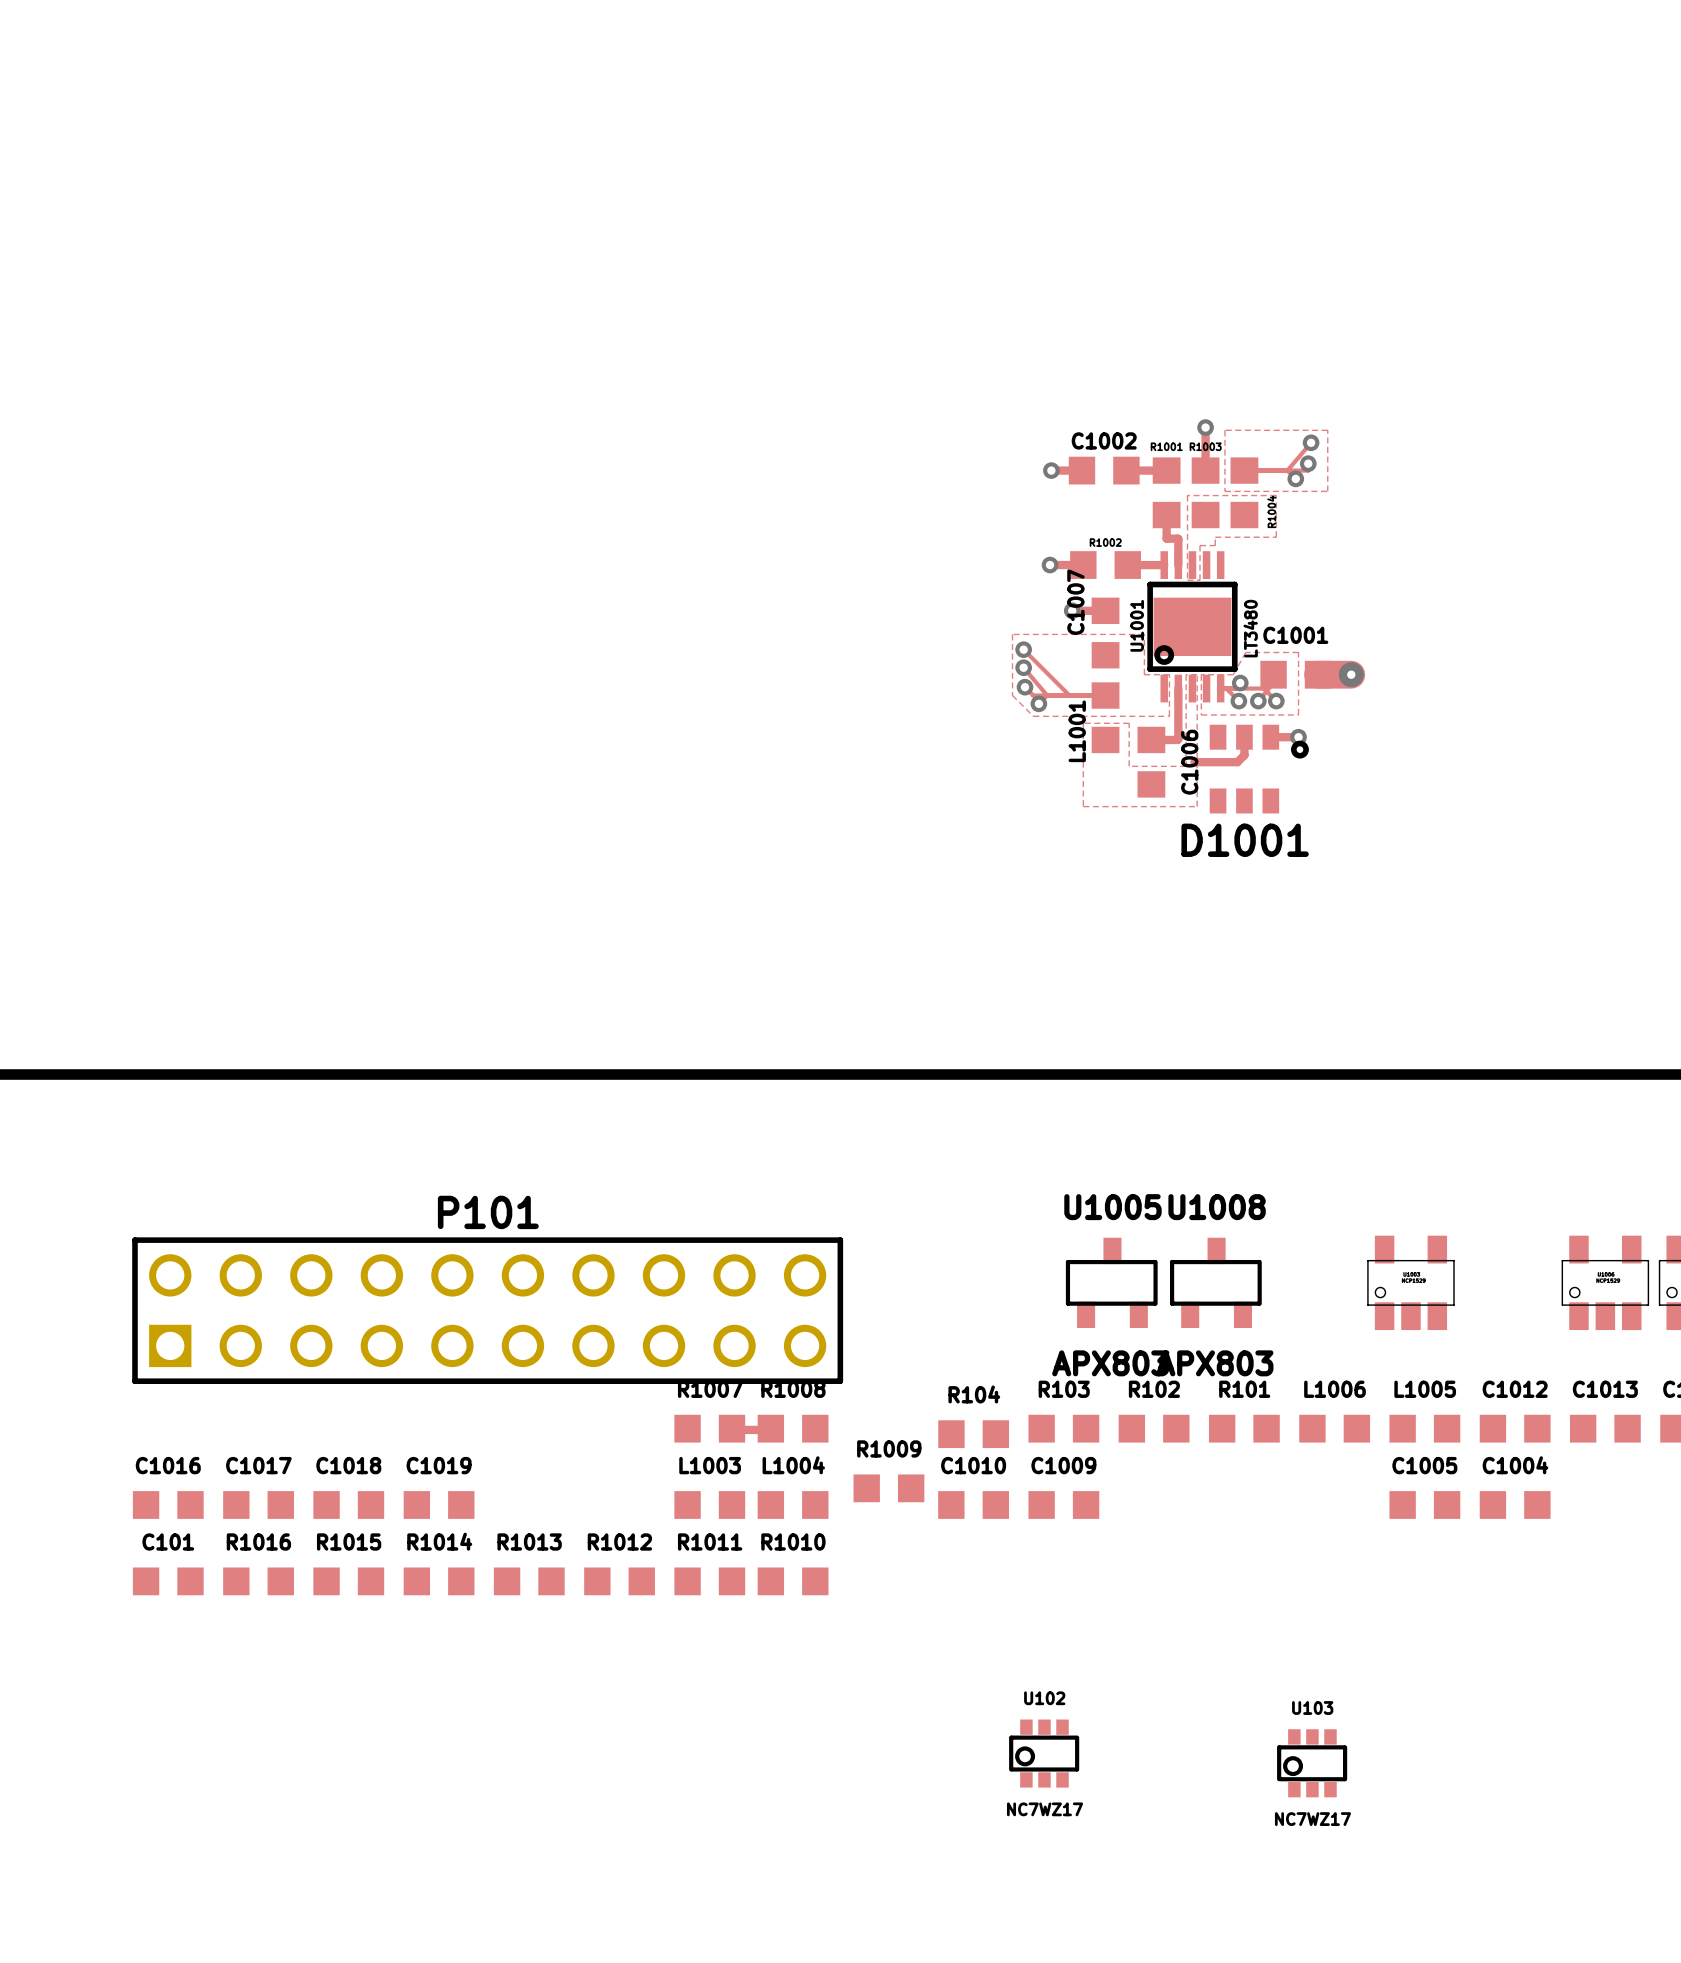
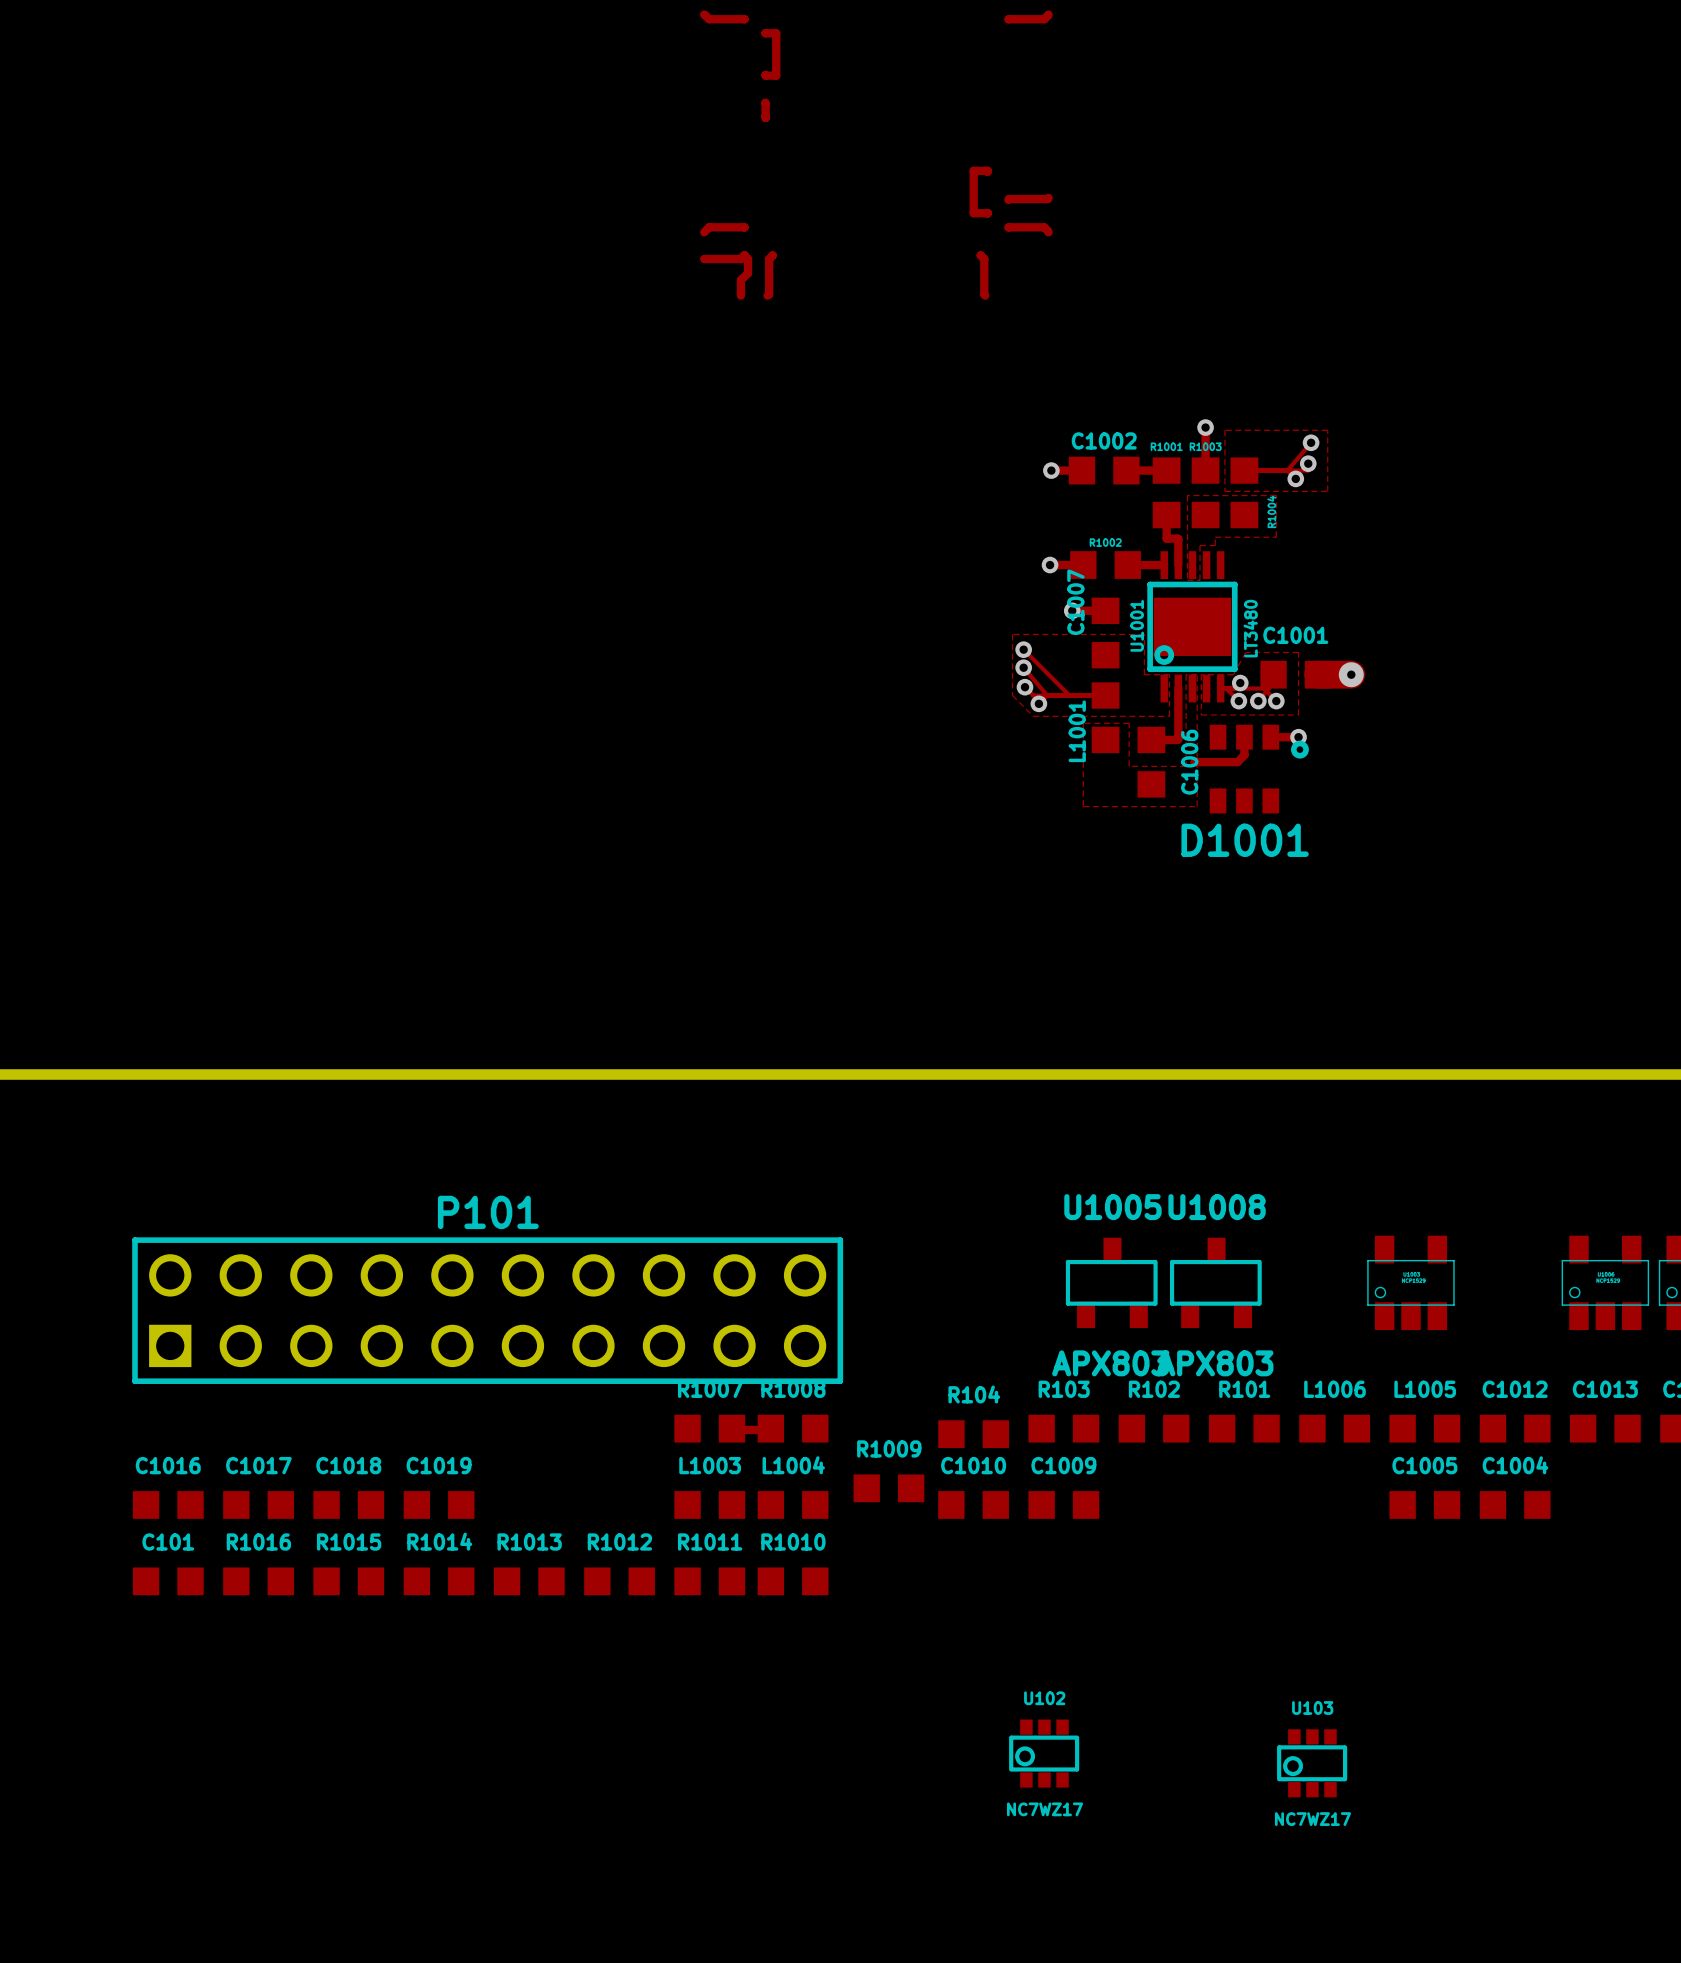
track: none -> (704, 14) (709, 19) (744, 19)
track: none -> (1048, 14) (1044, 19) (1008, 19)
track: none -> (765, 33) (776, 33) (776, 75) (765, 74)
track: none -> (765, 102) (765, 116)
track: none -> (987, 172) (973, 170) (973, 213) (987, 213)
track: none -> (1048, 197) (1008, 199)
track: none -> (744, 227) (709, 227) (704, 232)
track: none -> (1008, 227) (1044, 227) (1048, 232)
track: none -> (772, 255) (769, 259) (769, 294) (767, 295)
track: none -> (980, 255) (984, 259) (985, 295)
track: none -> (704, 258) (740, 259) (744, 255) (748, 259) (748, 273) (740, 280) (740, 295)

